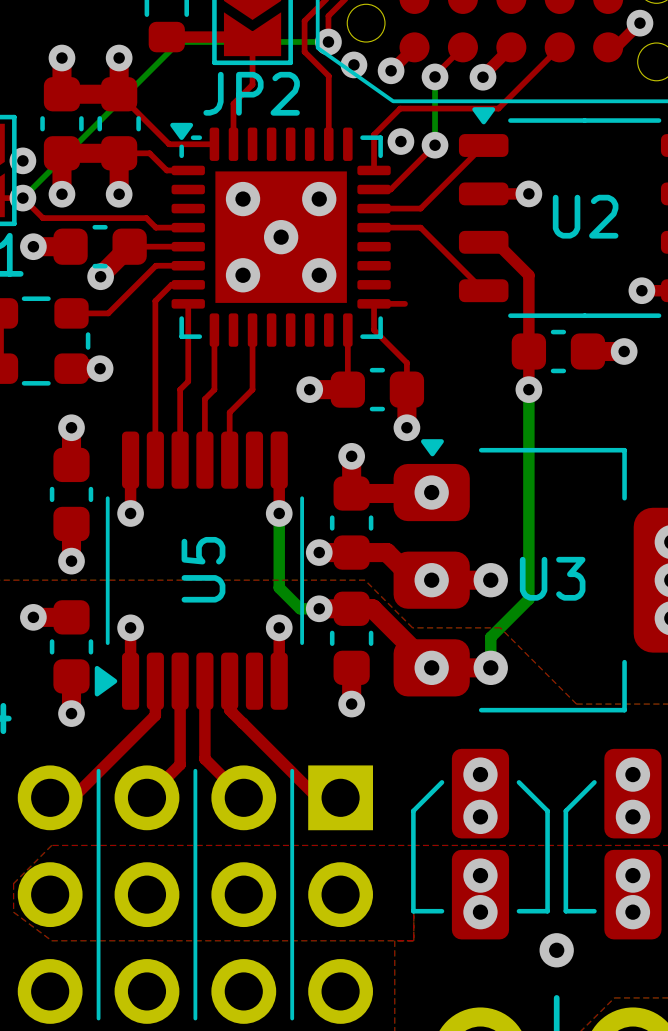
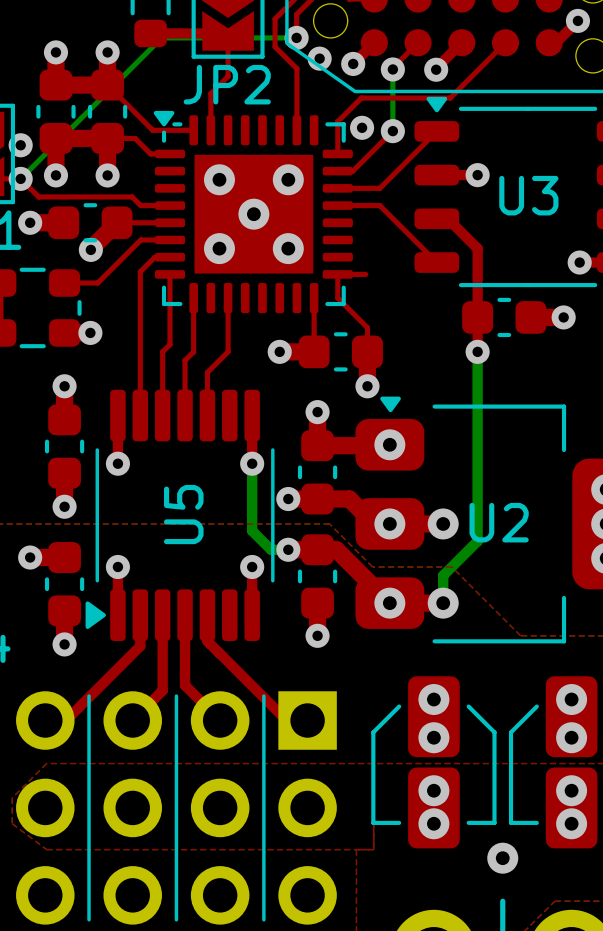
U2 name: U2 (585, 216) -> U3 (528, 195)
U3 name: U3 (552, 578) -> U2 (499, 522)

